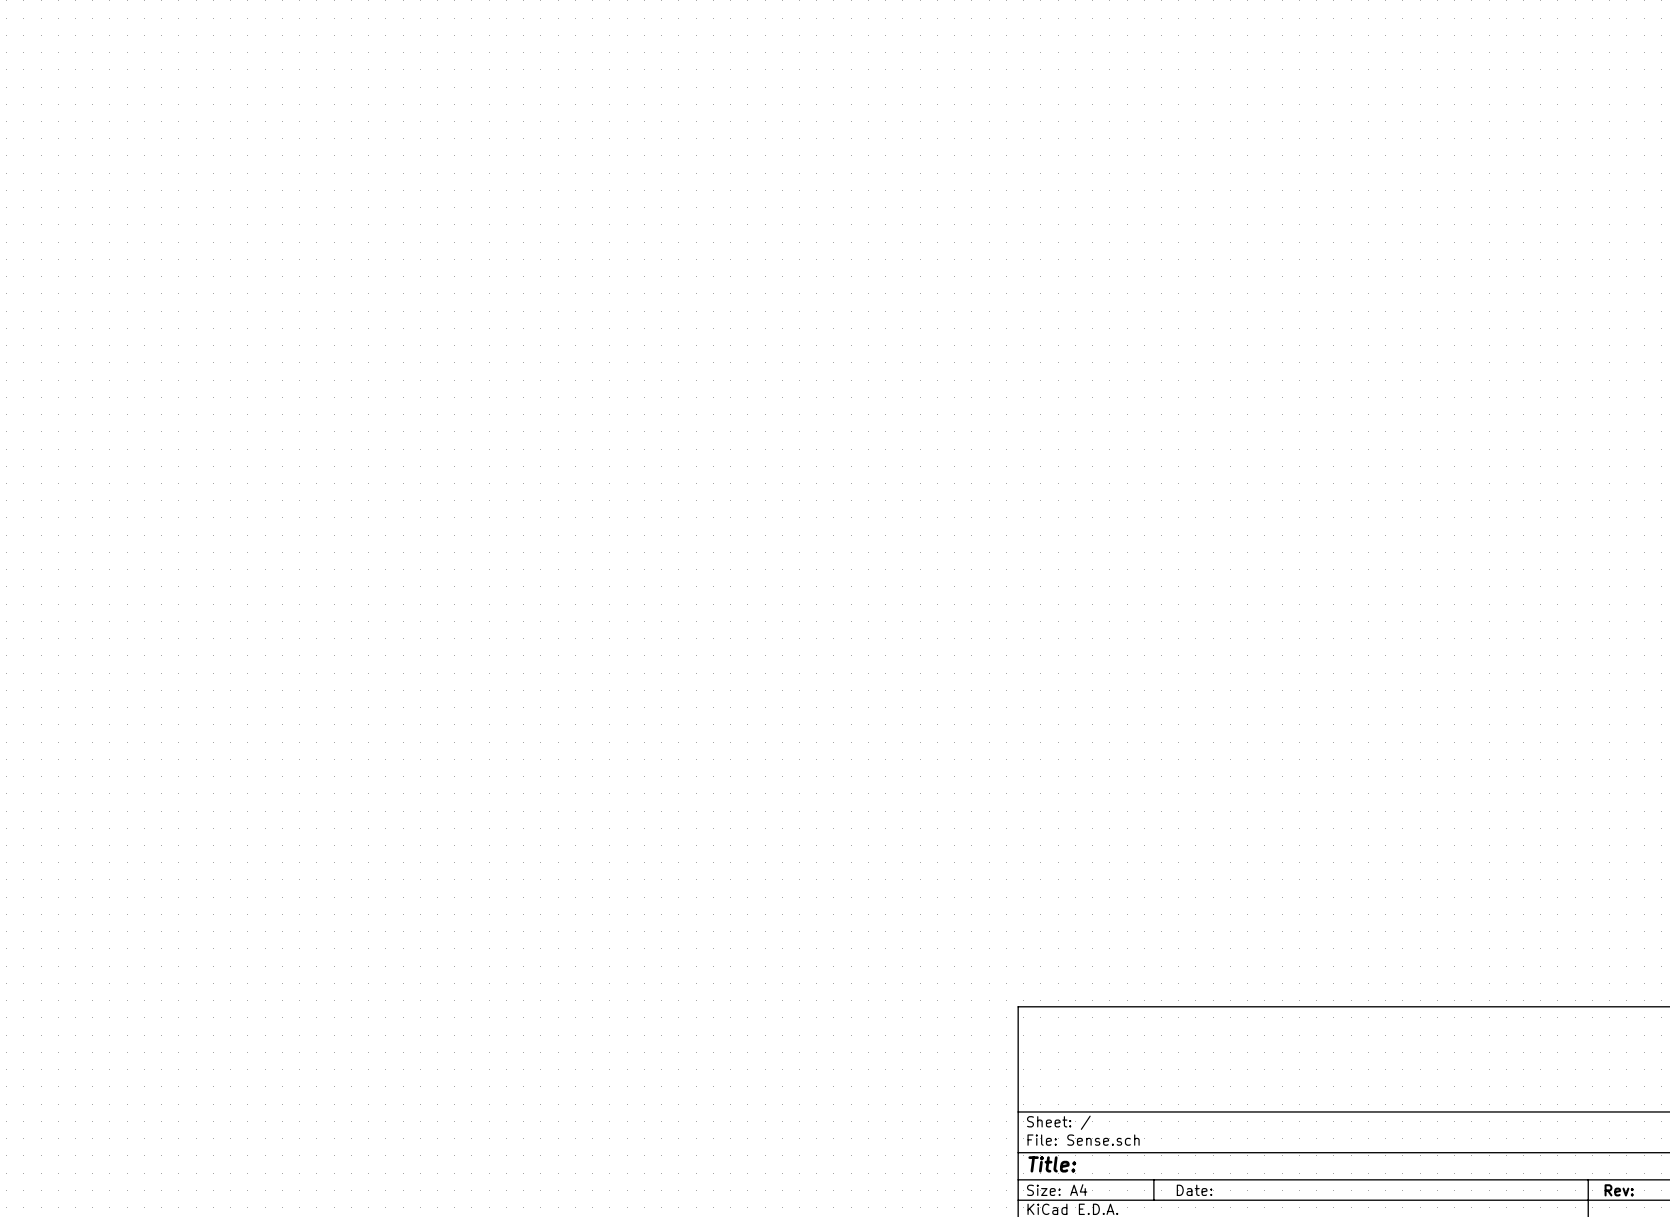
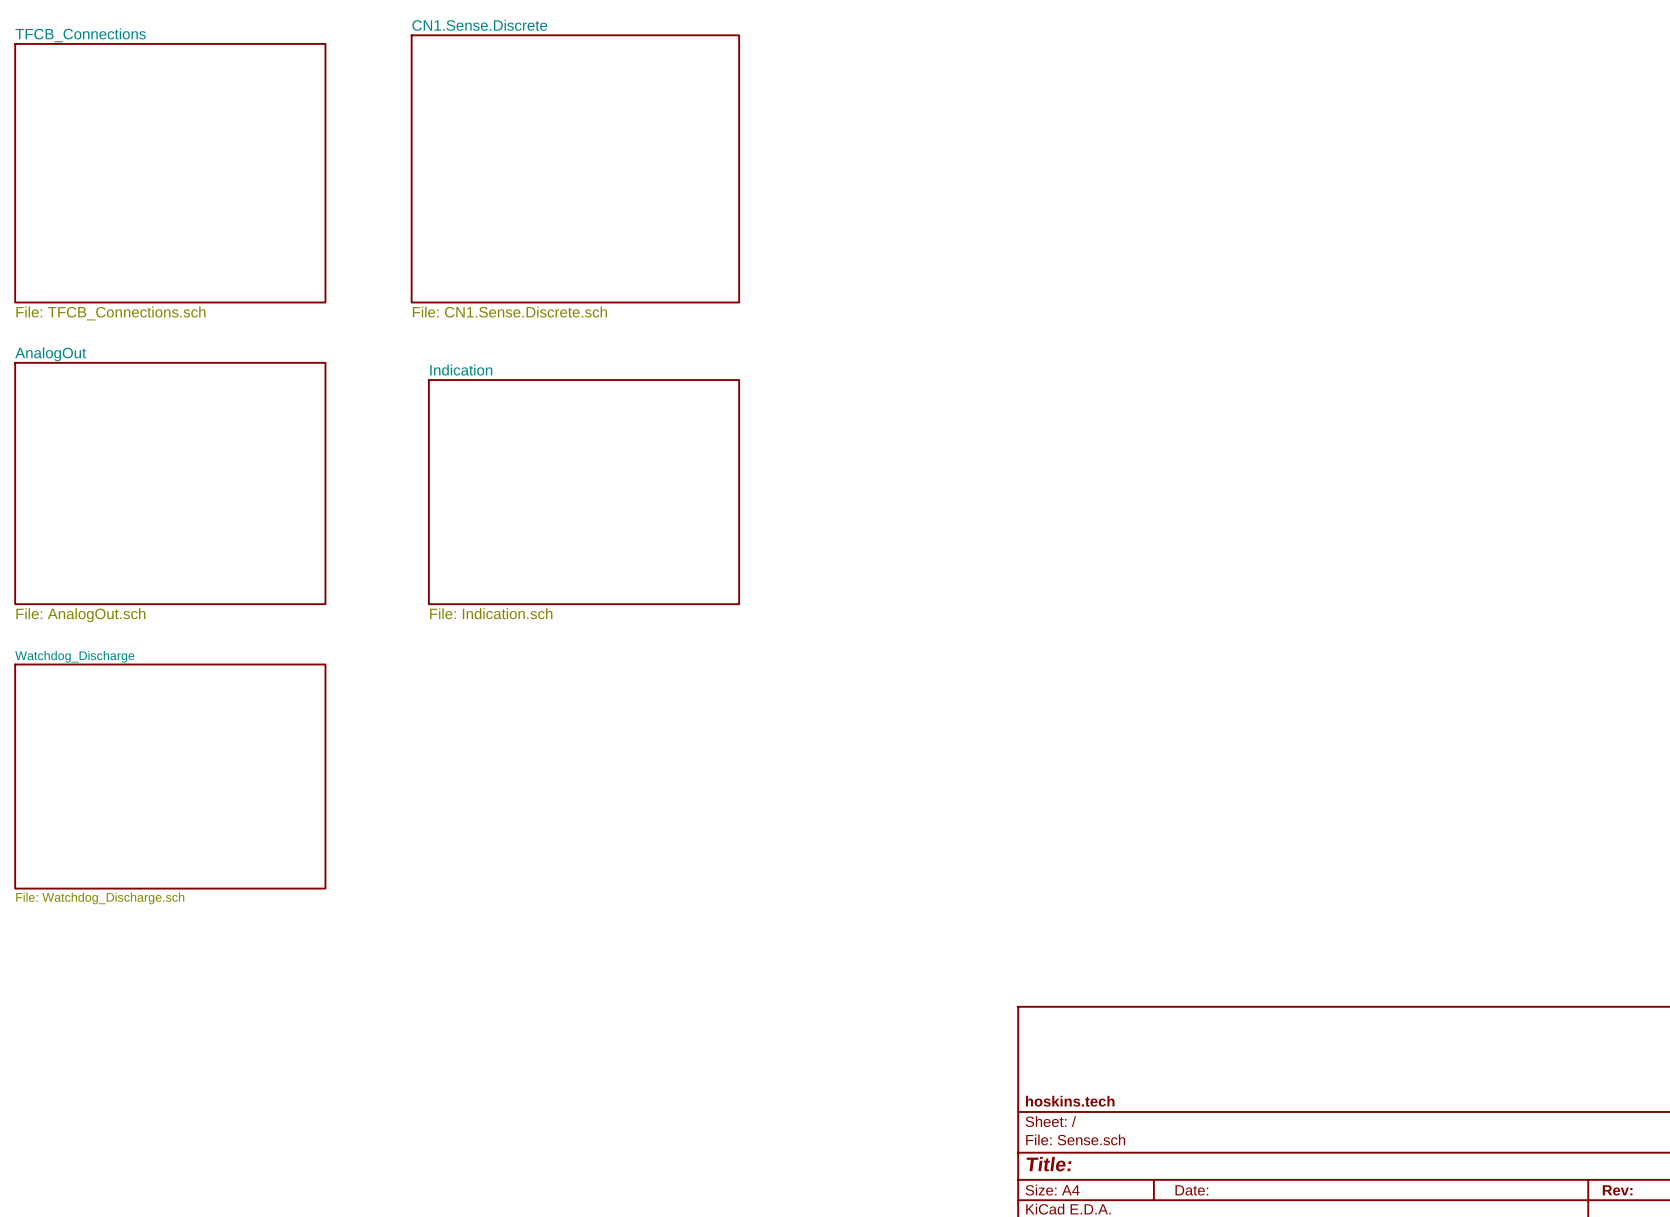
sheet CN1.Sense.Discrete: none -> File: CN1.Sense.Discrete.sch (575, 168)
sheet TFCB_Connections: none -> File: TFCB_Connections.sch (170, 173)
sheet AnalogOut: none -> File: AnalogOut.sch (170, 483)
sheet Indication: none -> File: Indication.sch (584, 492)
sheet Watchdog_Discharge: none -> File: Watchdog_Discharge.sch (170, 776)
title block: none -> hoskins.tech (1070, 1101)

